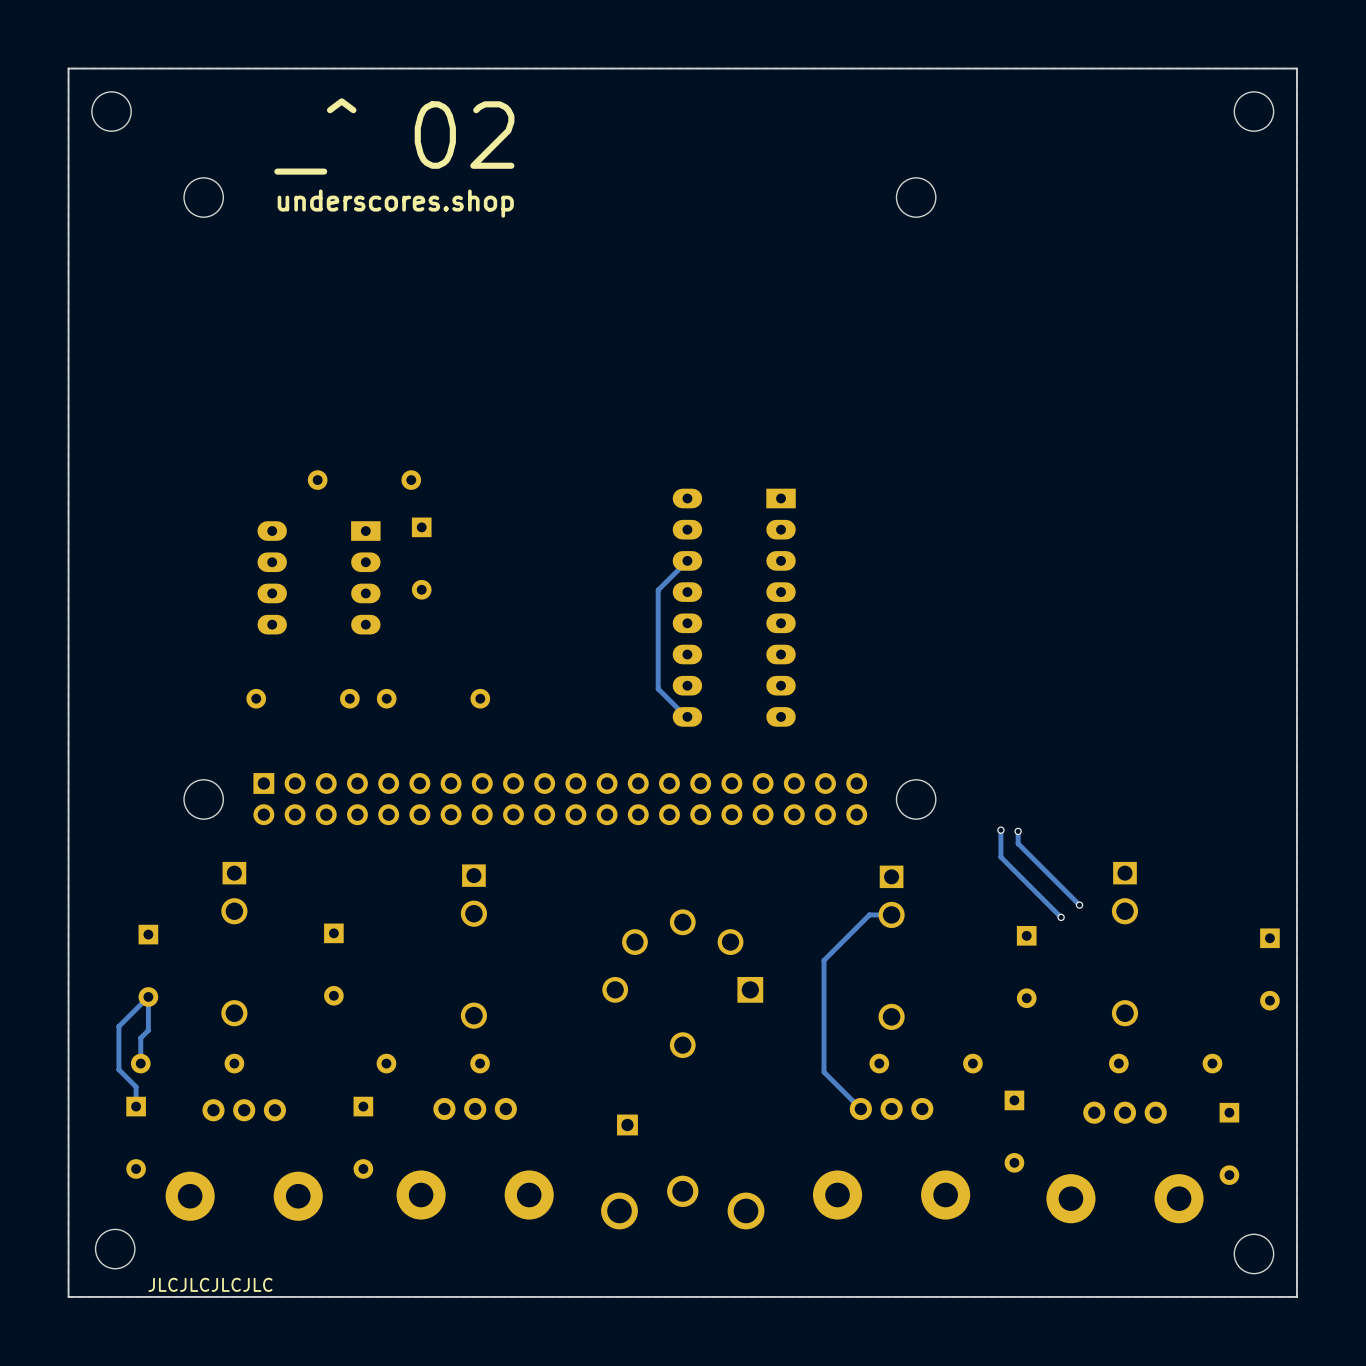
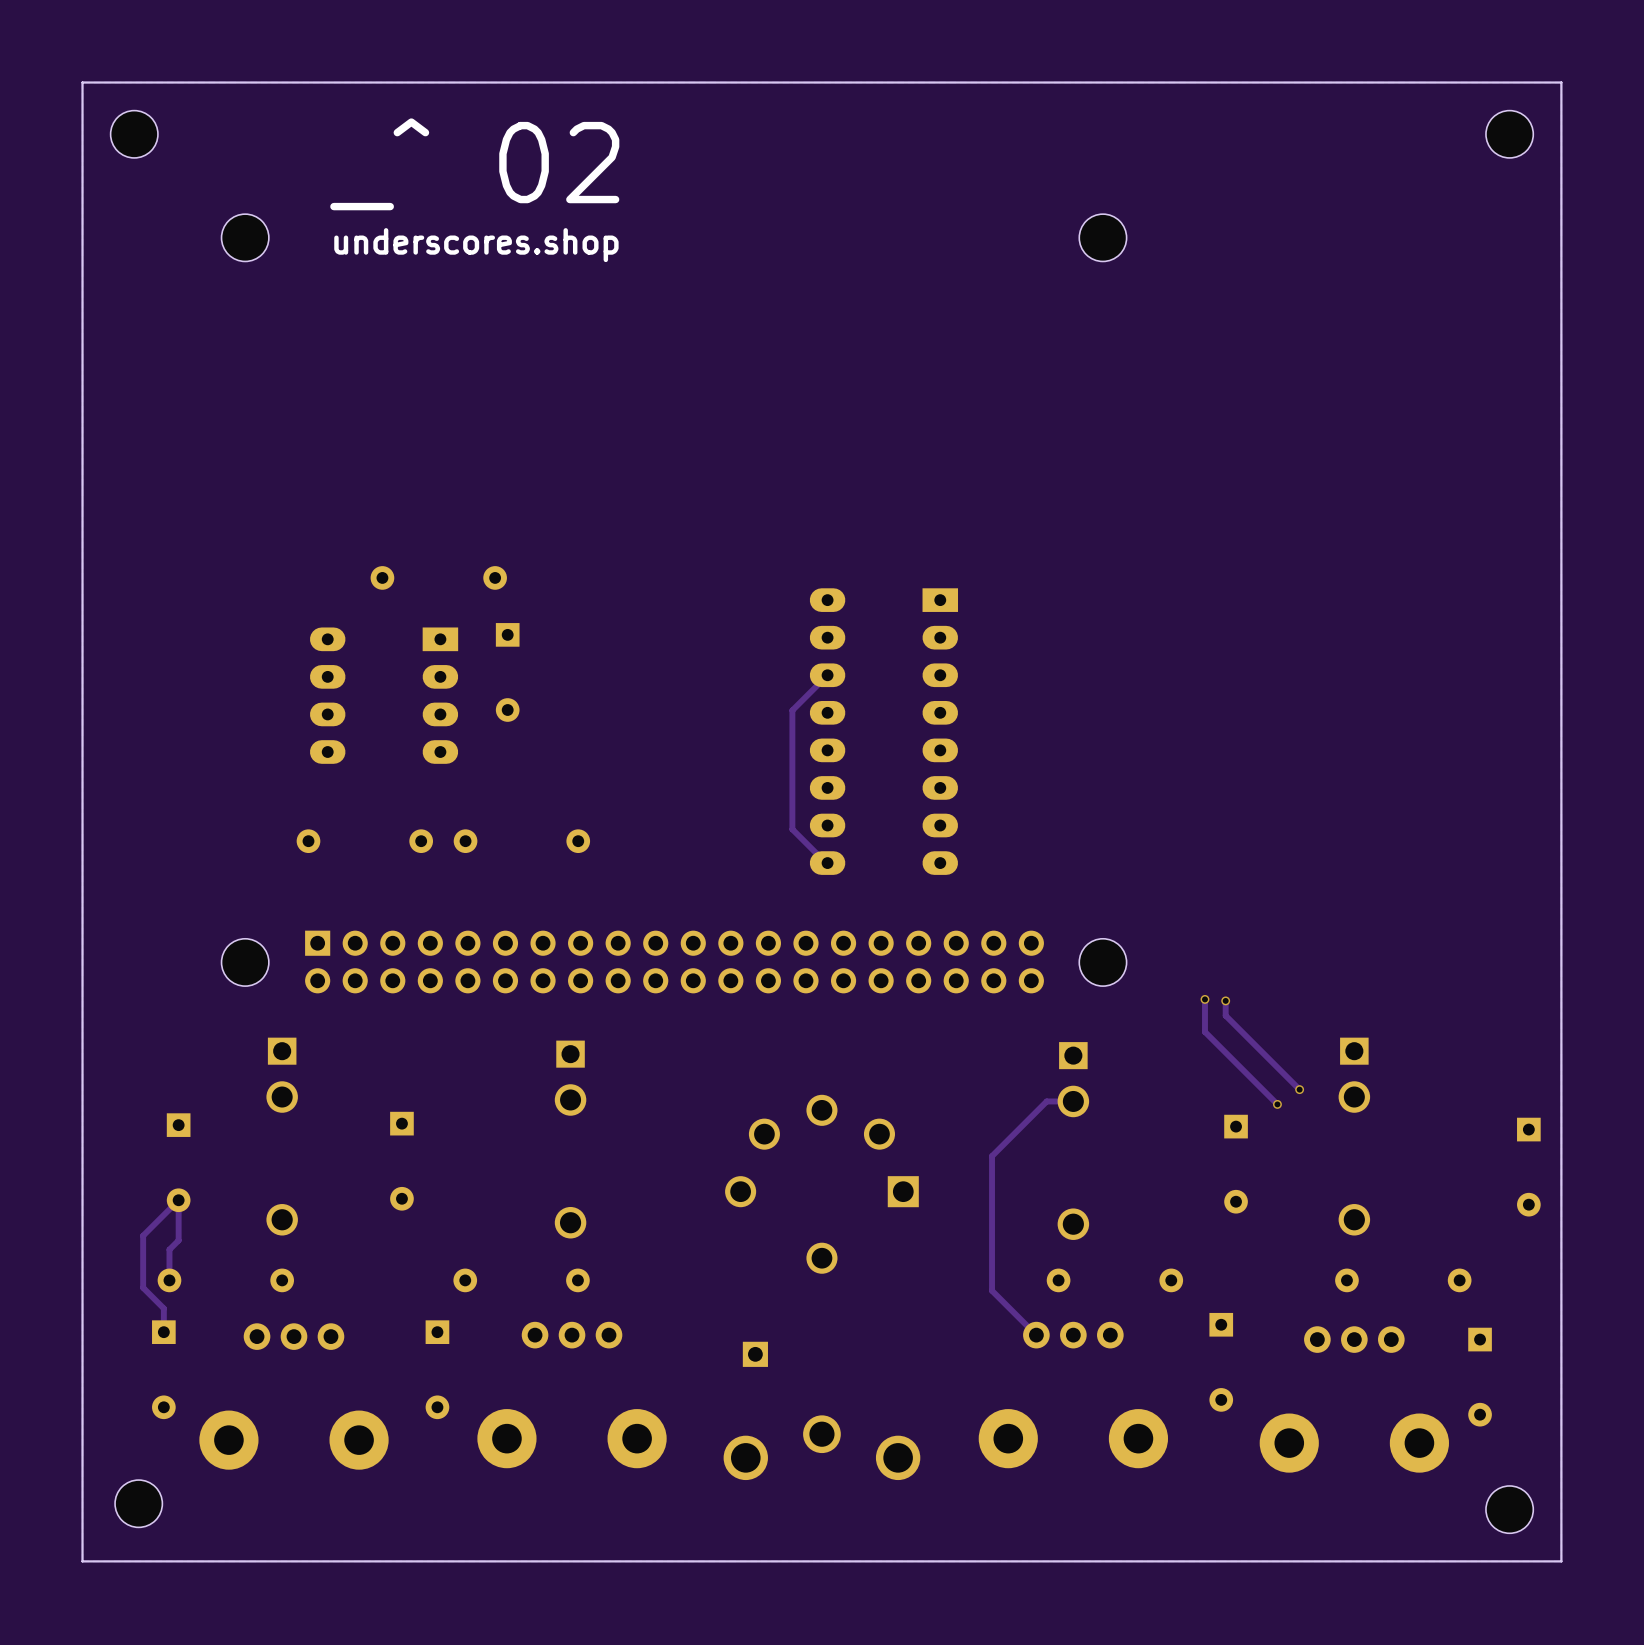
text: JLCJLCJLCJLC (210, 1284) -> none

